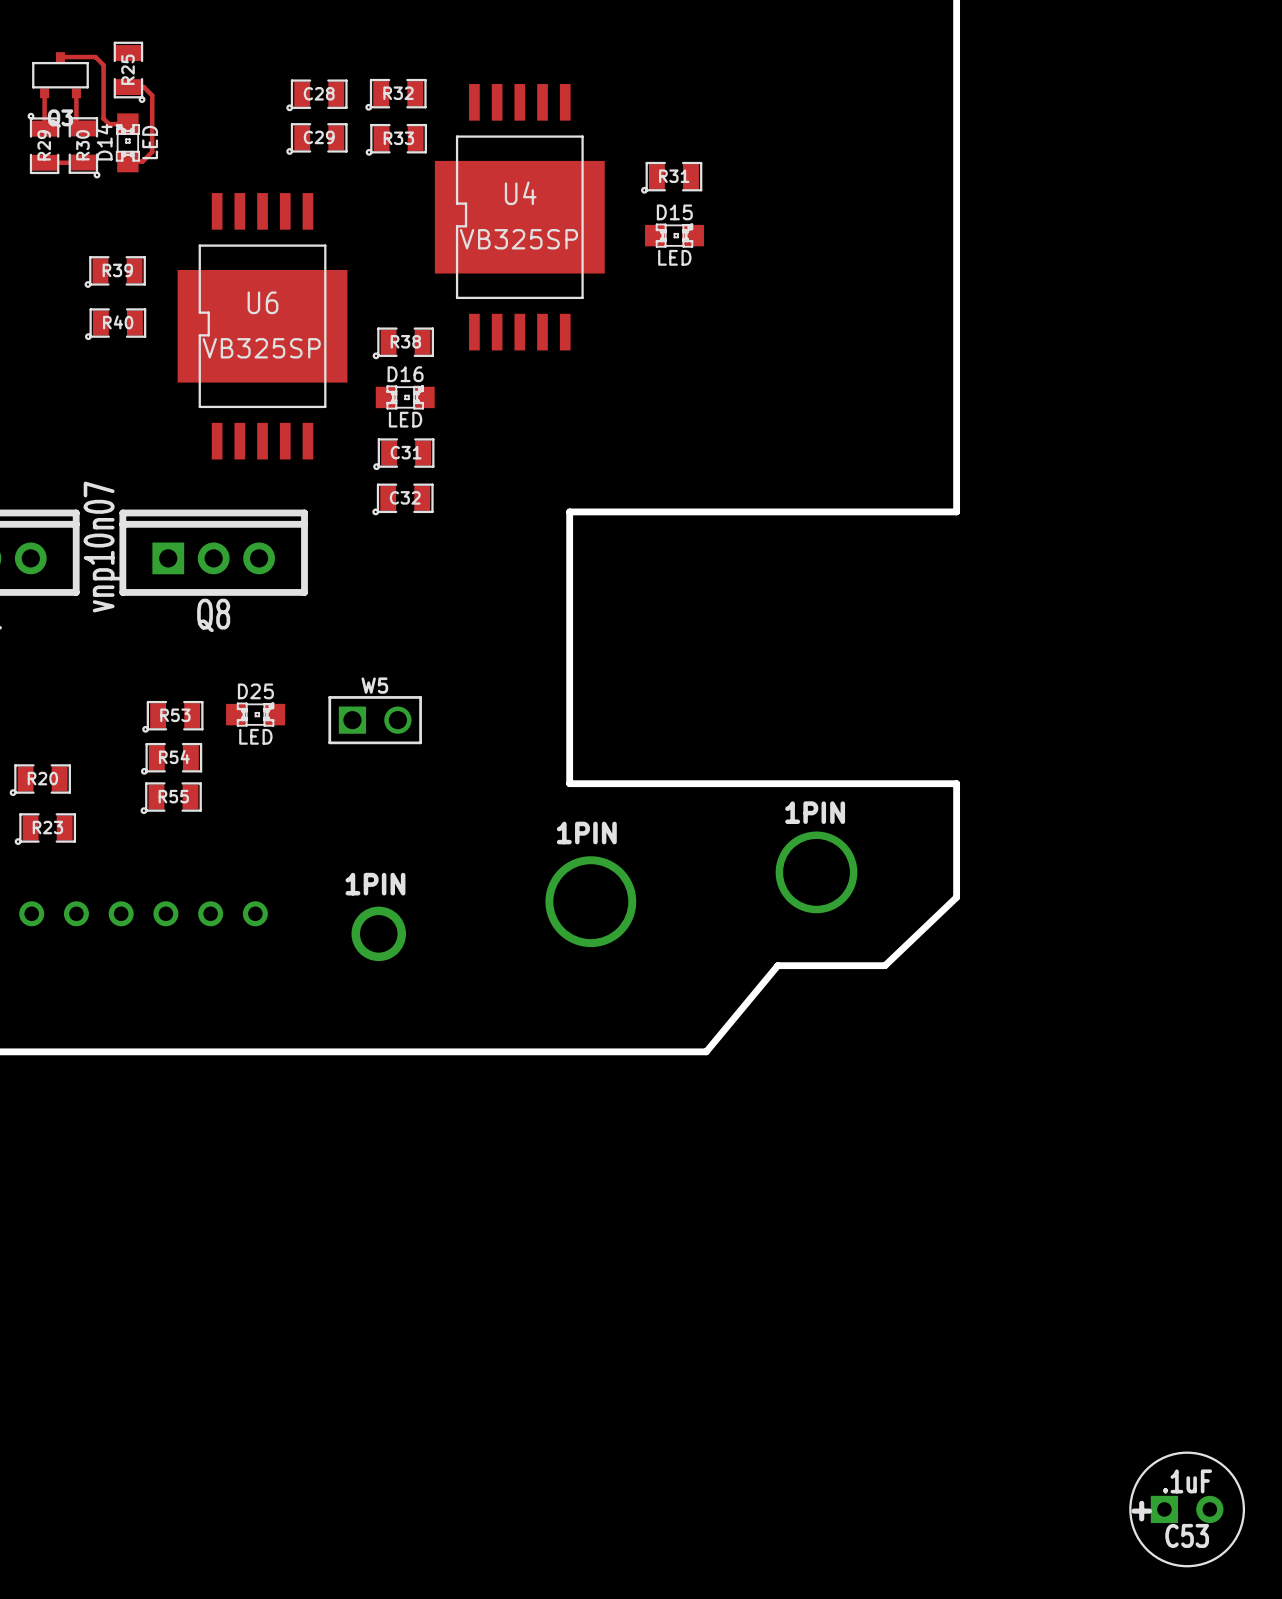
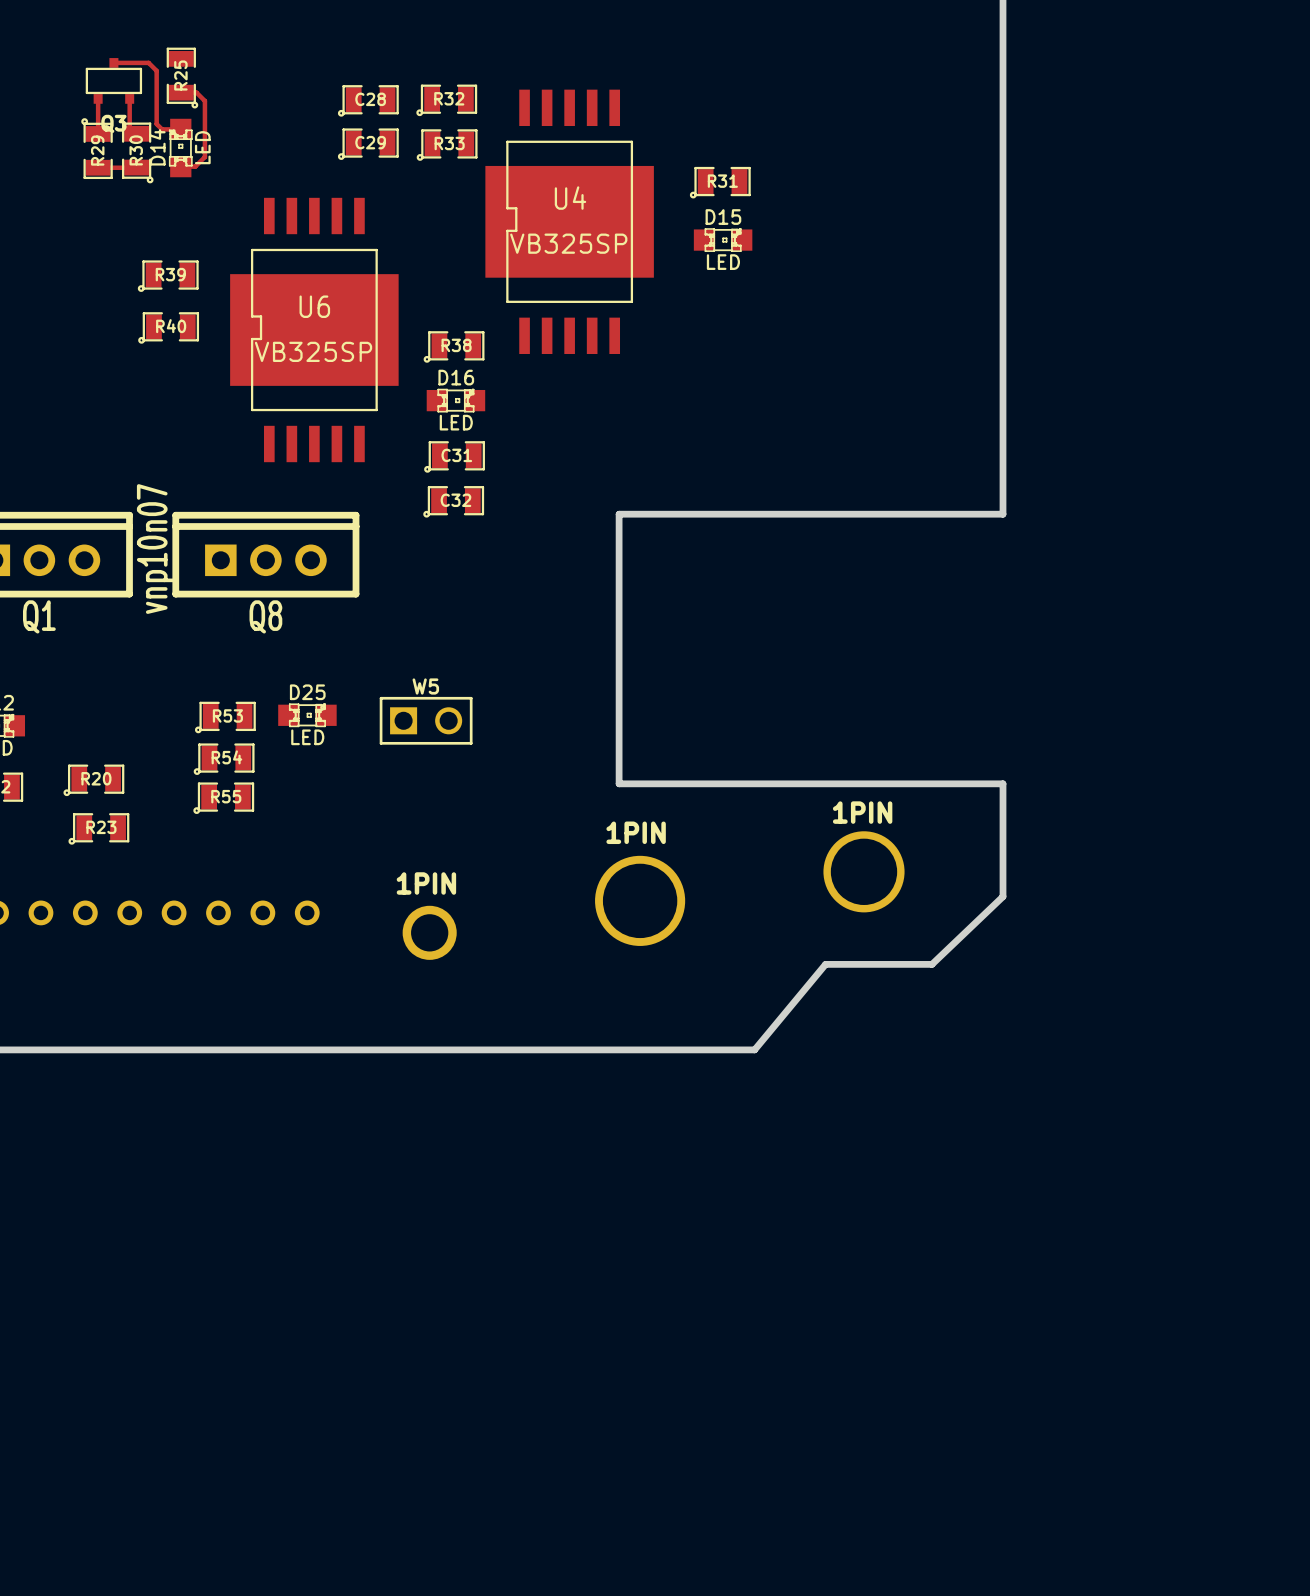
C53: .1uF (1187, 1509) -> none

